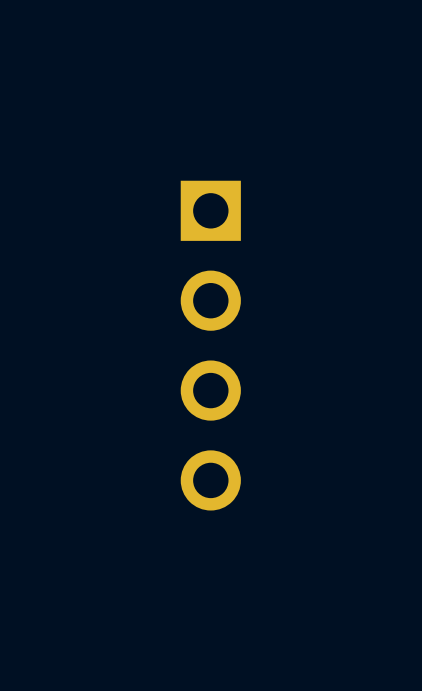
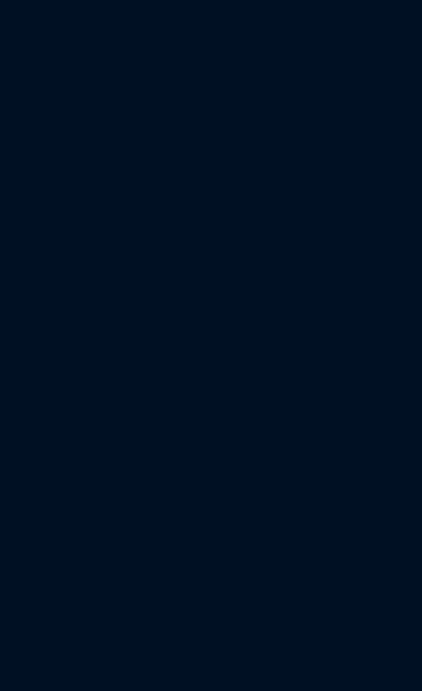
part: (210, 345) -> none

